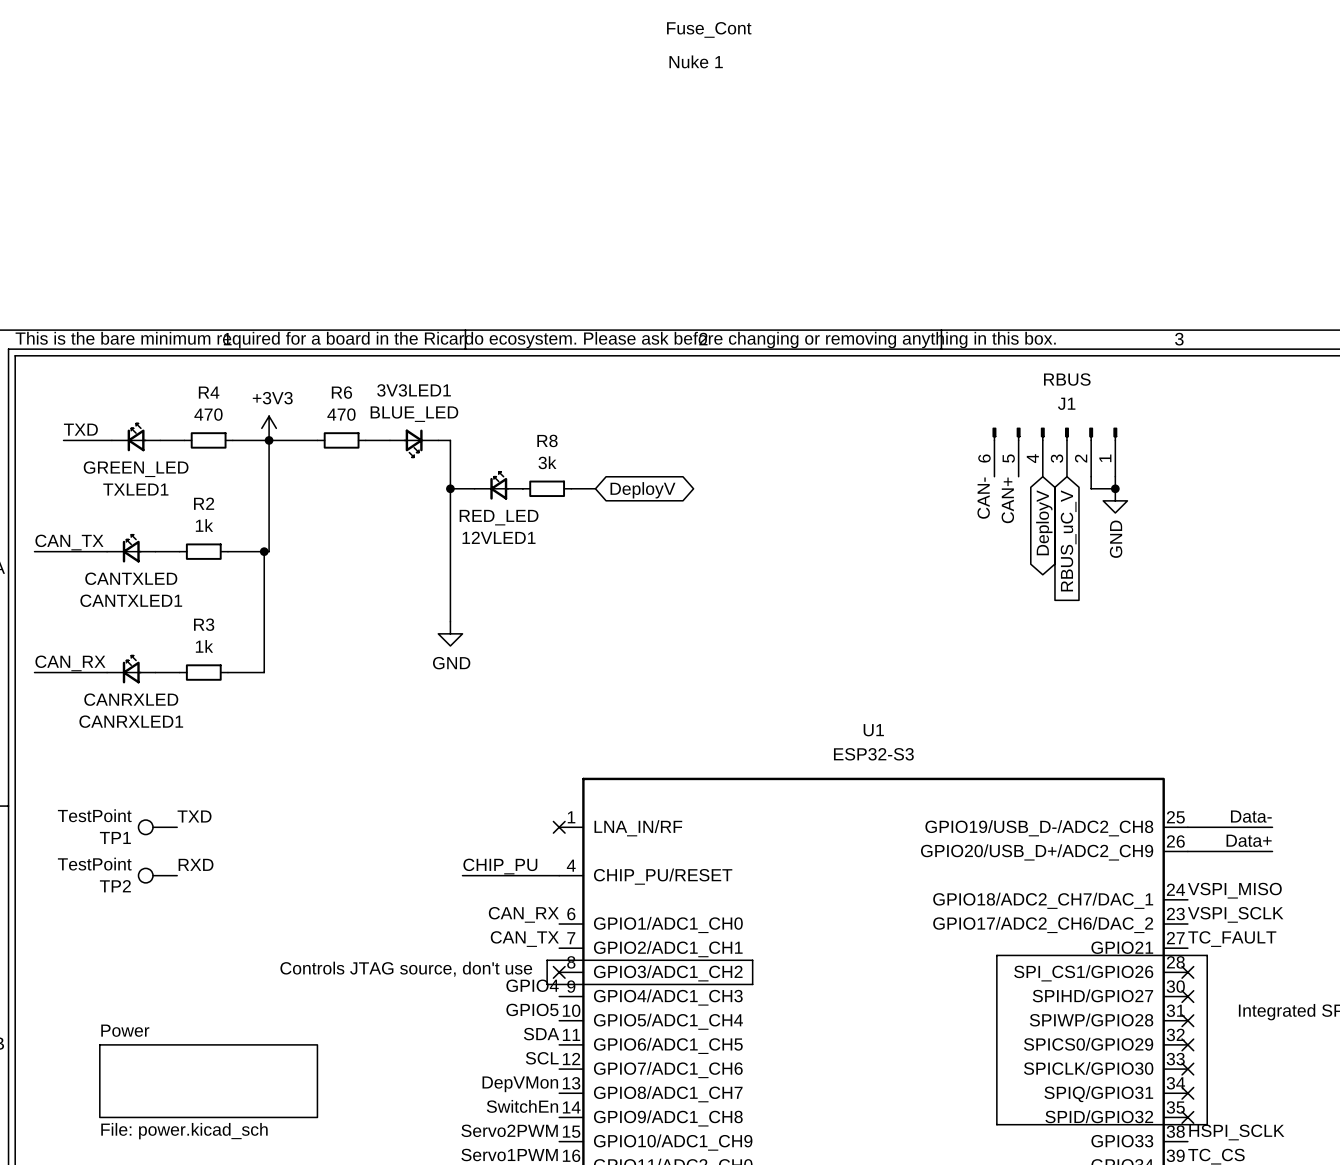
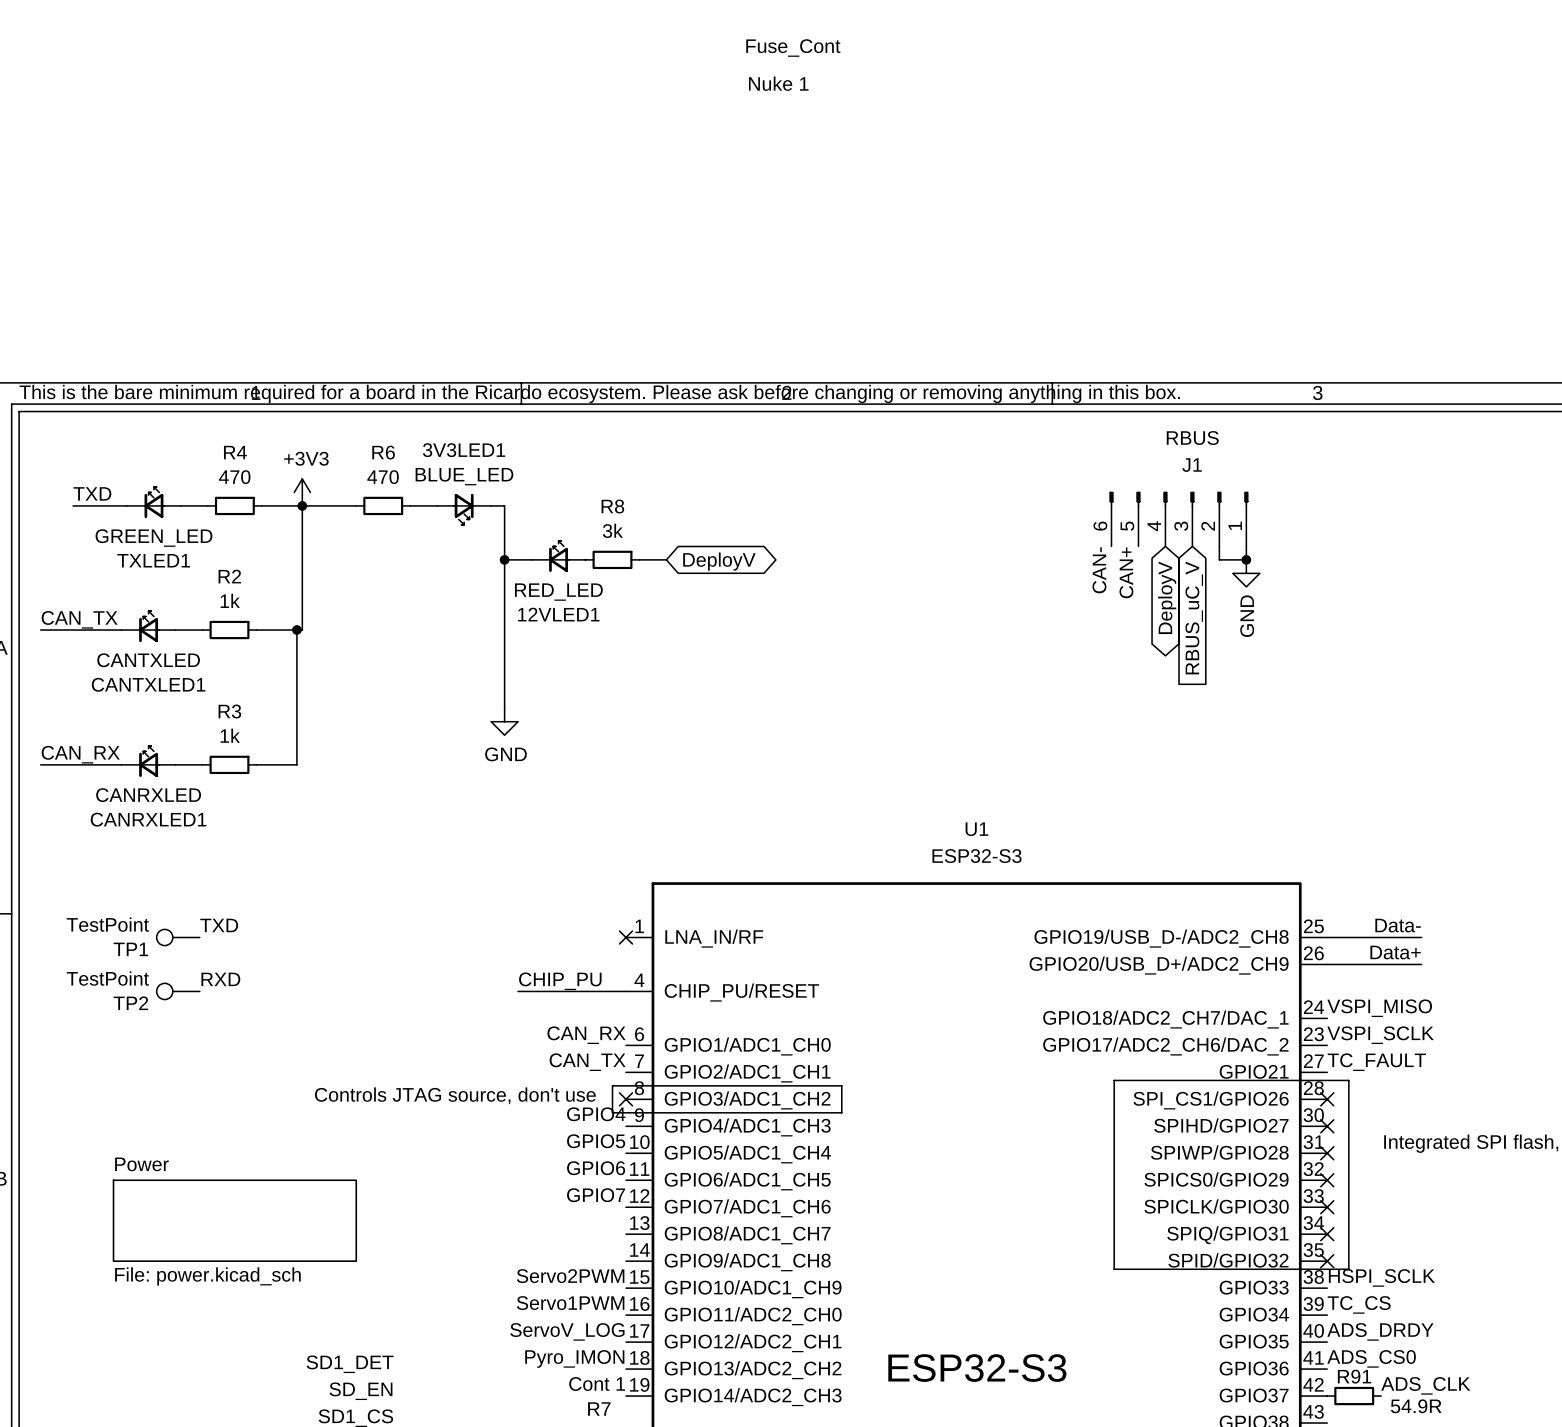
label: SDA (541, 1034) -> GPIO6 (596, 1168)
label: SCL (542, 1058) -> GPIO7 (596, 1195)
label: DepVMon (520, 1084) -> none
label: SwitchEn (522, 1106) -> none

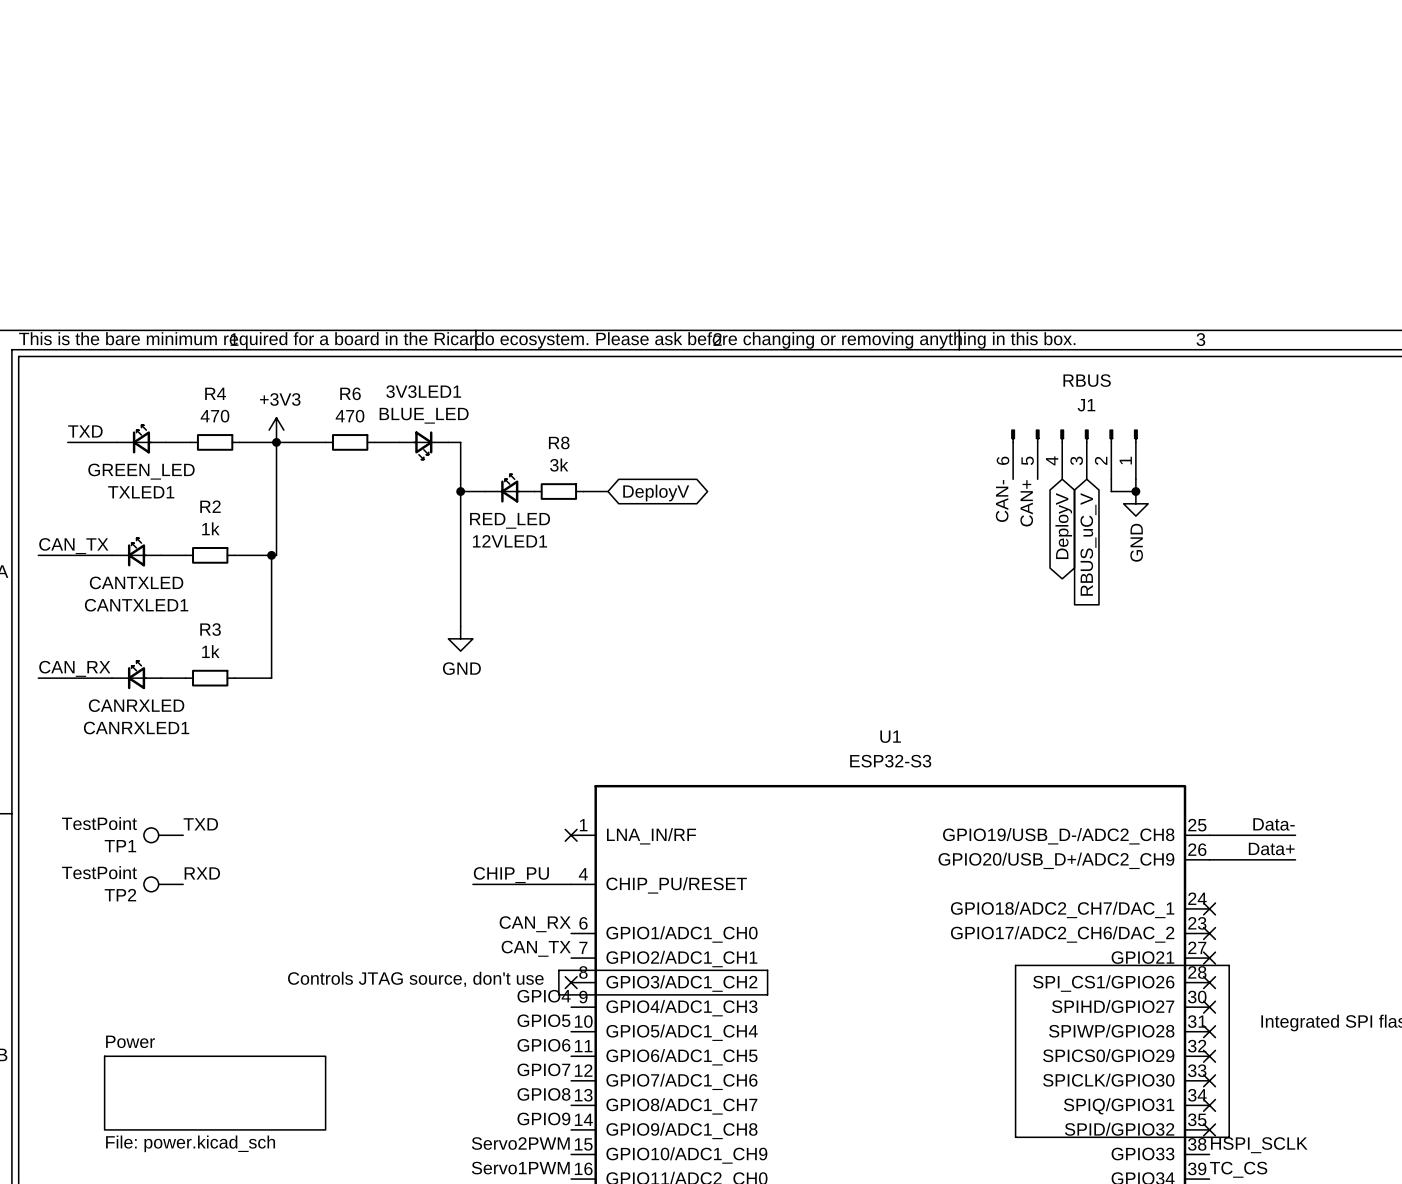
label: Fuse_Cont (793, 48) -> none
label: Nuke 1 (778, 83) -> none
label: VSPI_MISO (1379, 1008) -> none
no-connect mark: none -> (1209, 908)
label: VSPI_SCLK (1380, 1035) -> none
no-connect mark: none -> (1209, 933)
label: TC_FAULT (1376, 1062) -> none
no-connect mark: none -> (1209, 958)
label: none -> GPIO8 (543, 1094)
label: none -> GPIO9 (543, 1118)

